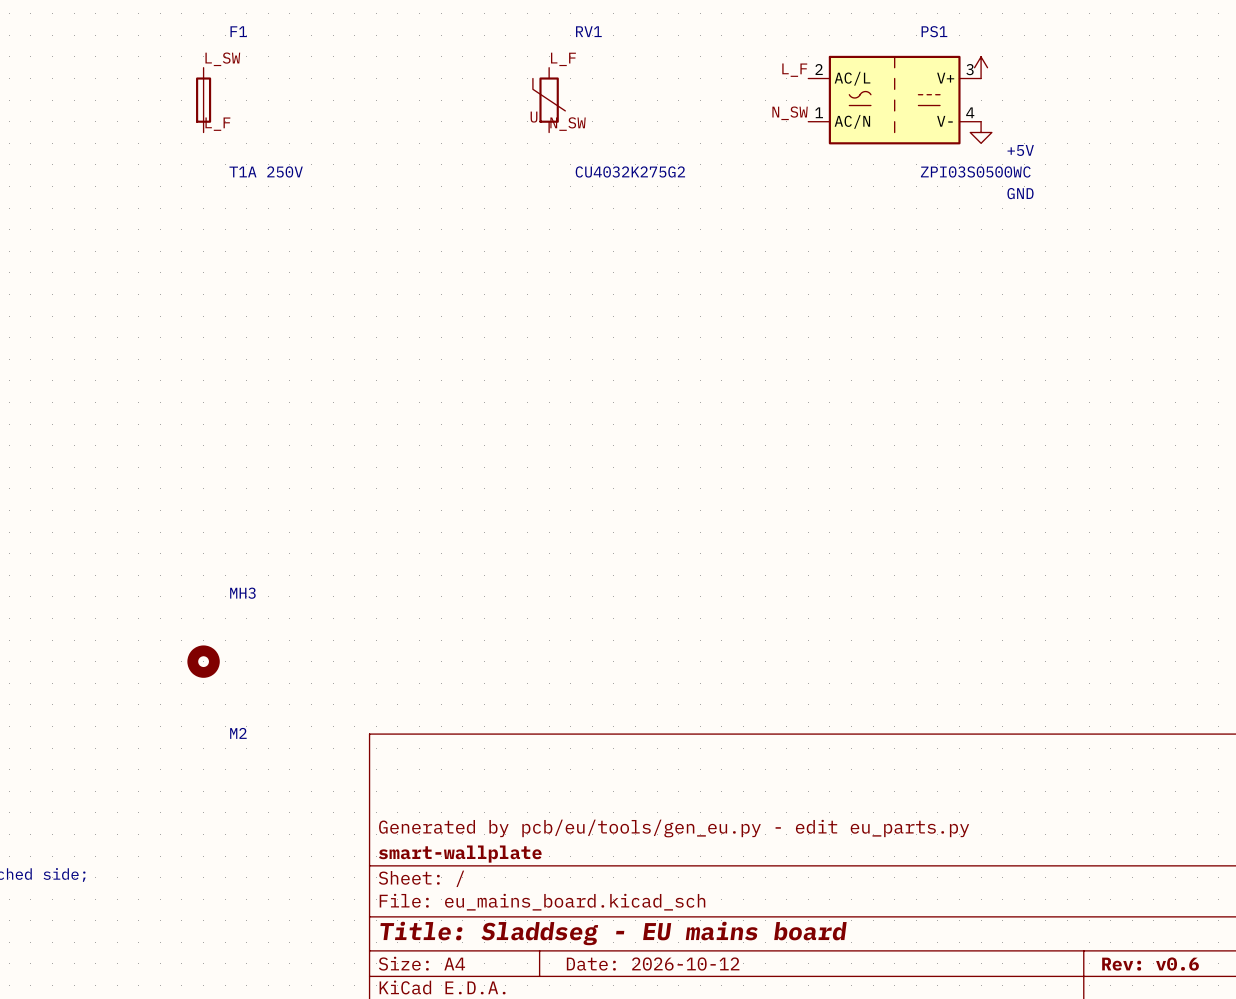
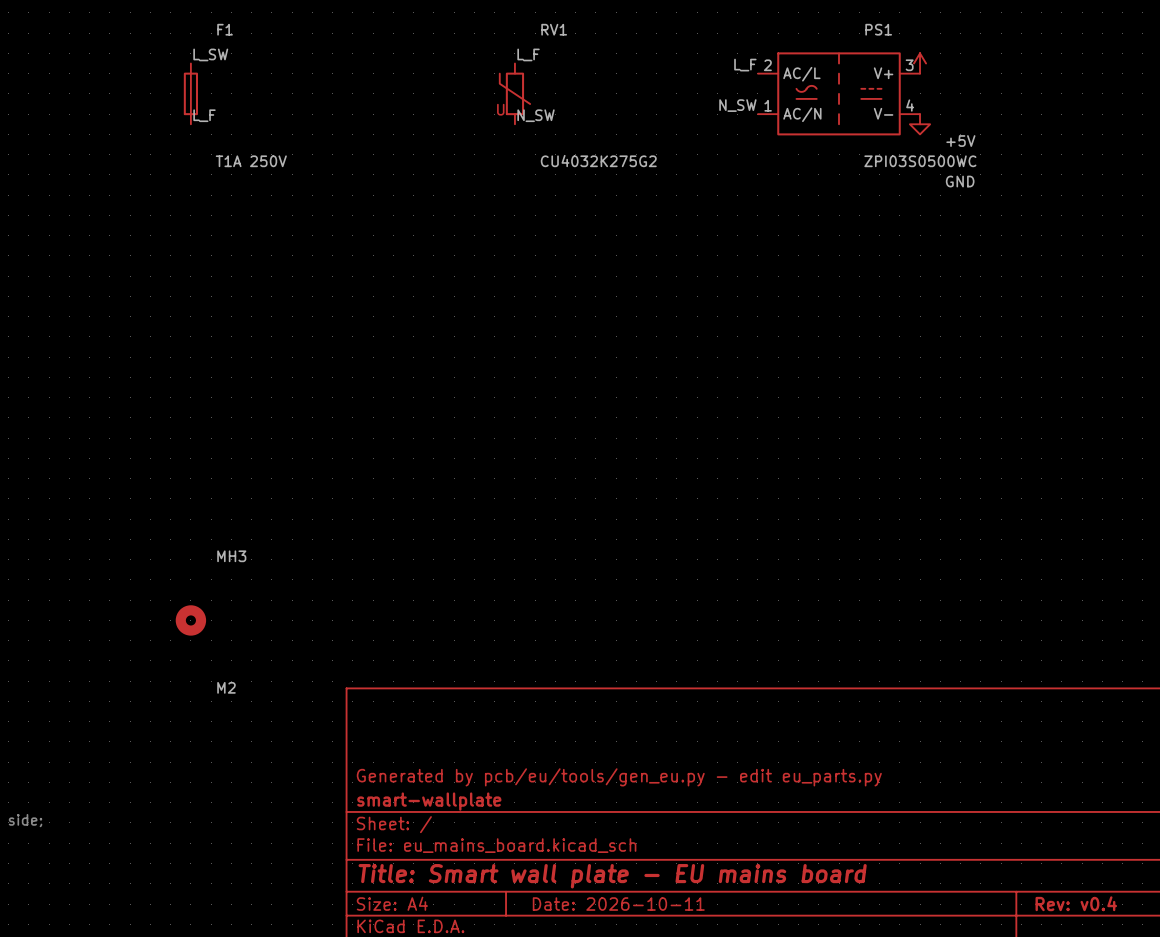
title block: Title: Sladdseg - EU mains board (613, 933) -> Title: Smart wall plate - EU mains board (612, 876)
title block: Date: 2026-10-12 (653, 964) -> Date: 2026-10-11 (618, 904)
title block: Rev: v0.6 (1150, 964) -> Rev: v0.4 (1076, 903)

